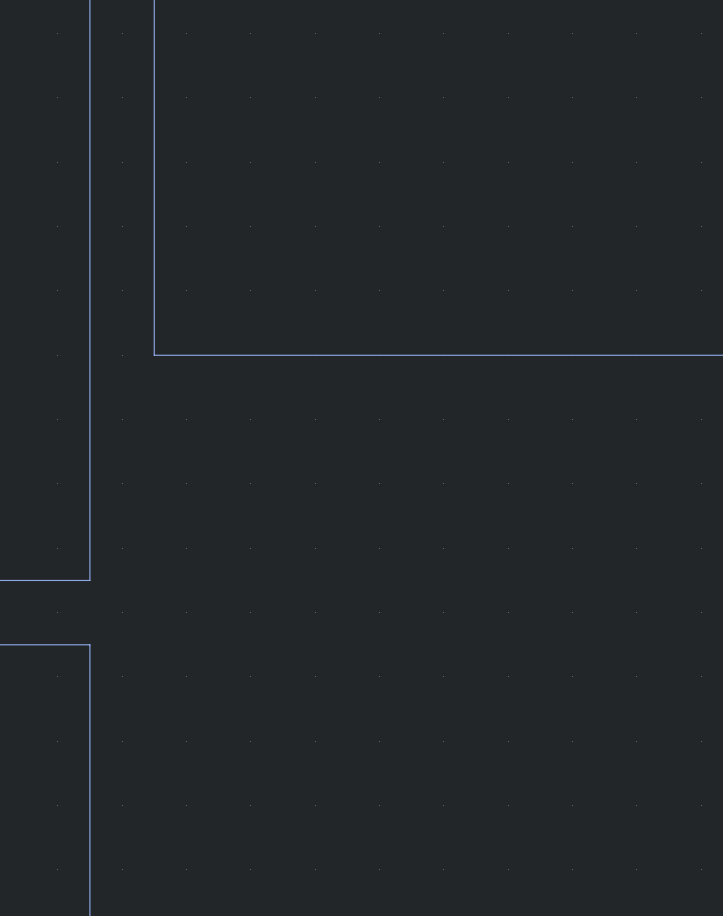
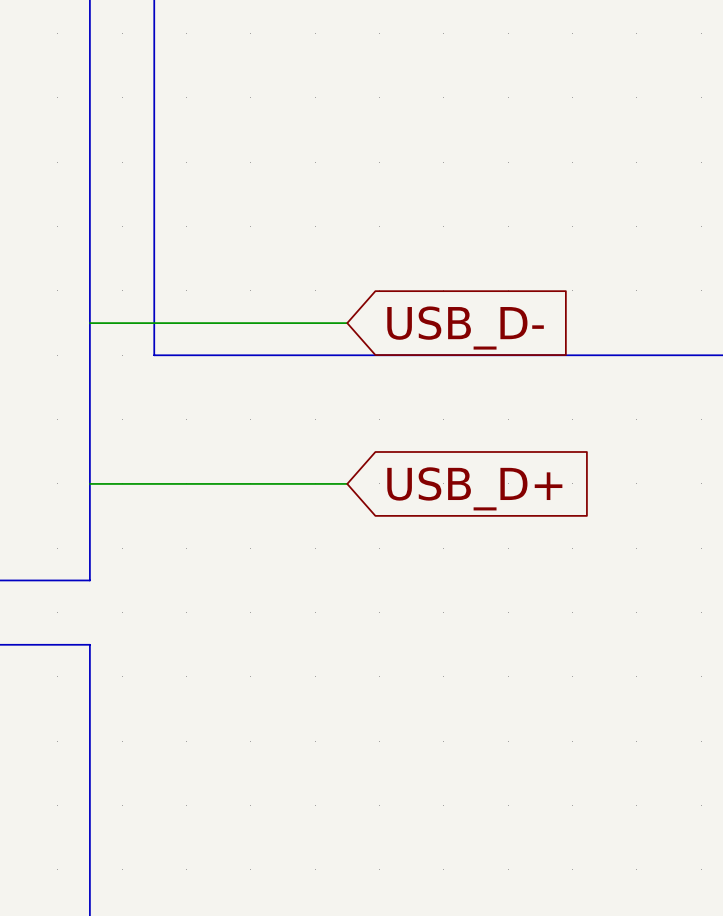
wire: none -> (89, 323) (347, 323)
global label: none -> USB_D- (465, 328)
wire: none -> (89, 483) (347, 483)
global label: none -> USB_D+ (474, 488)

